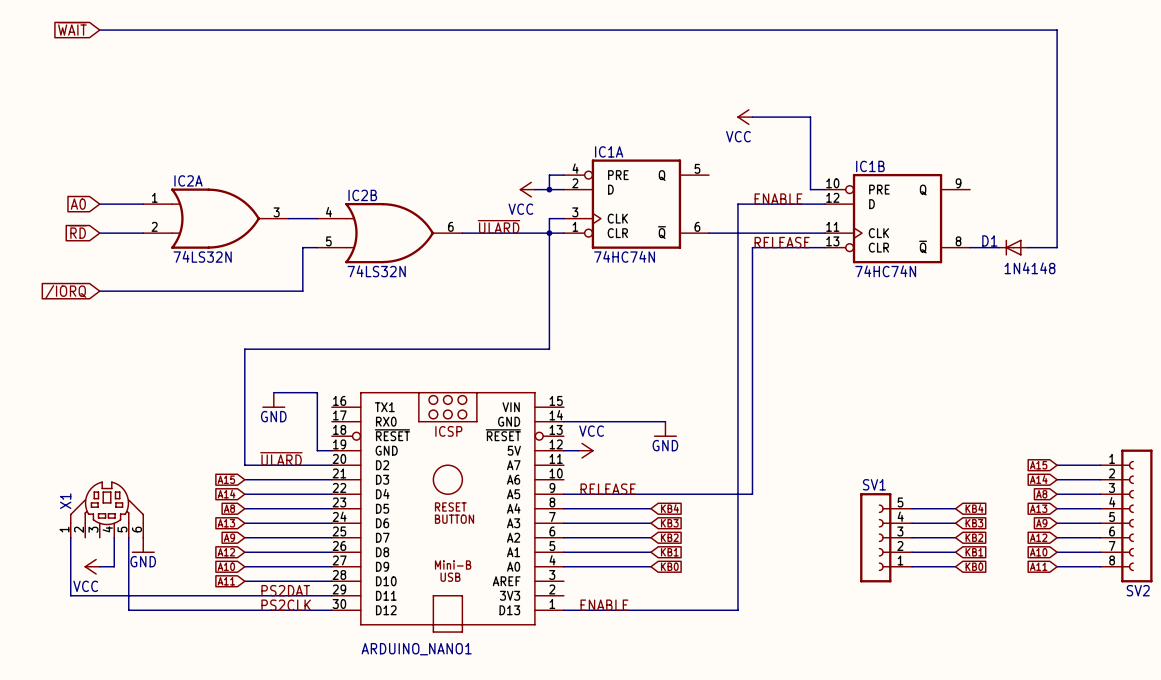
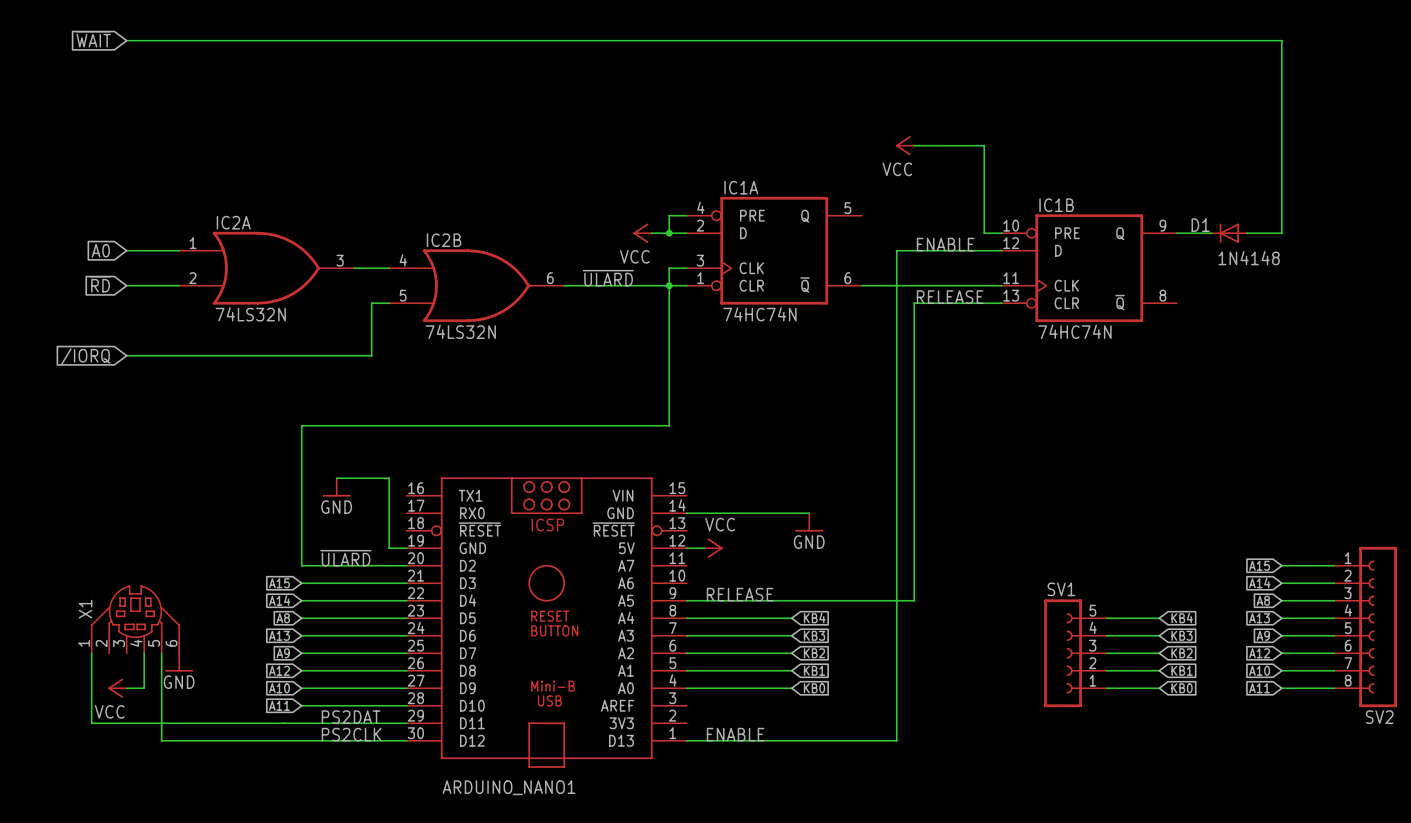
wire: (1057, 189) (1057, 247) (1028, 247) -> (1281, 233) (1246, 233)
wire: (970, 247) (999, 247) -> (1176, 233) (1211, 233)
D1 position: (1013, 247) -> (1229, 233)

